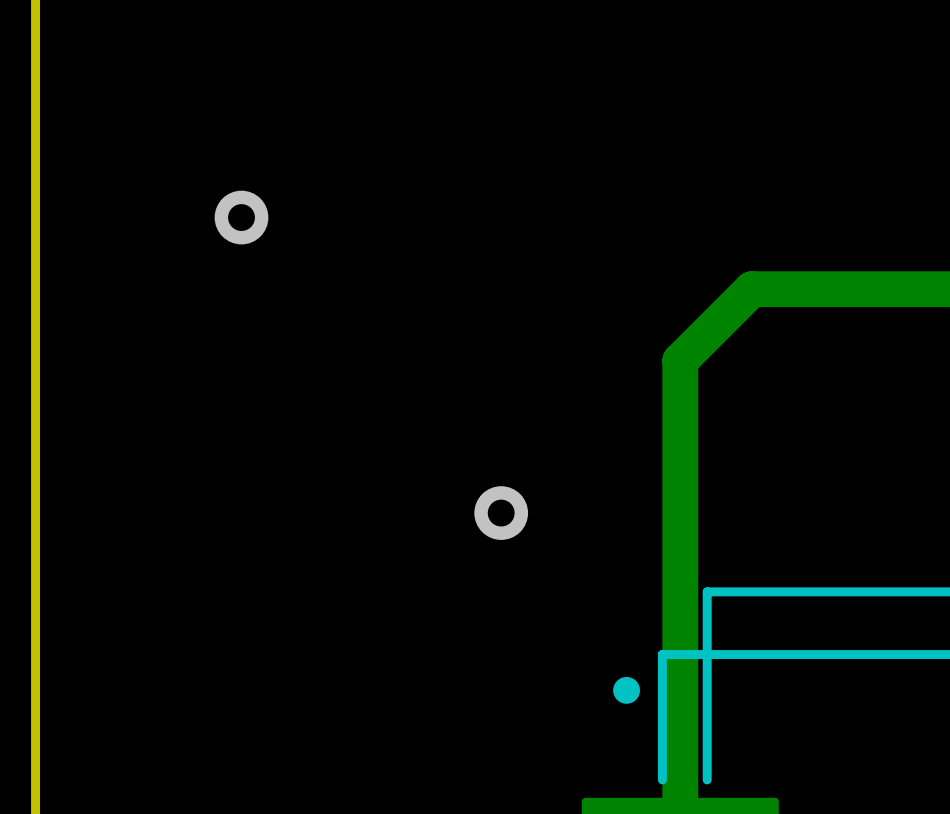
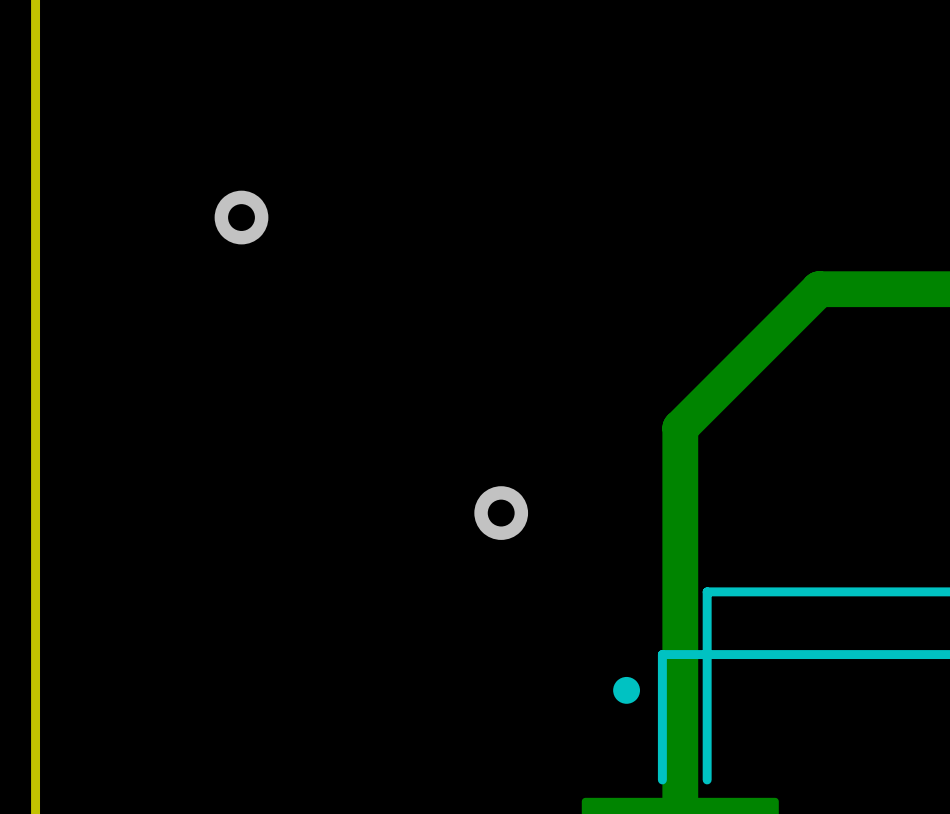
track: (819, 289) (751, 289) (680, 360) (680, 427) -> (819, 289) (680, 427)

